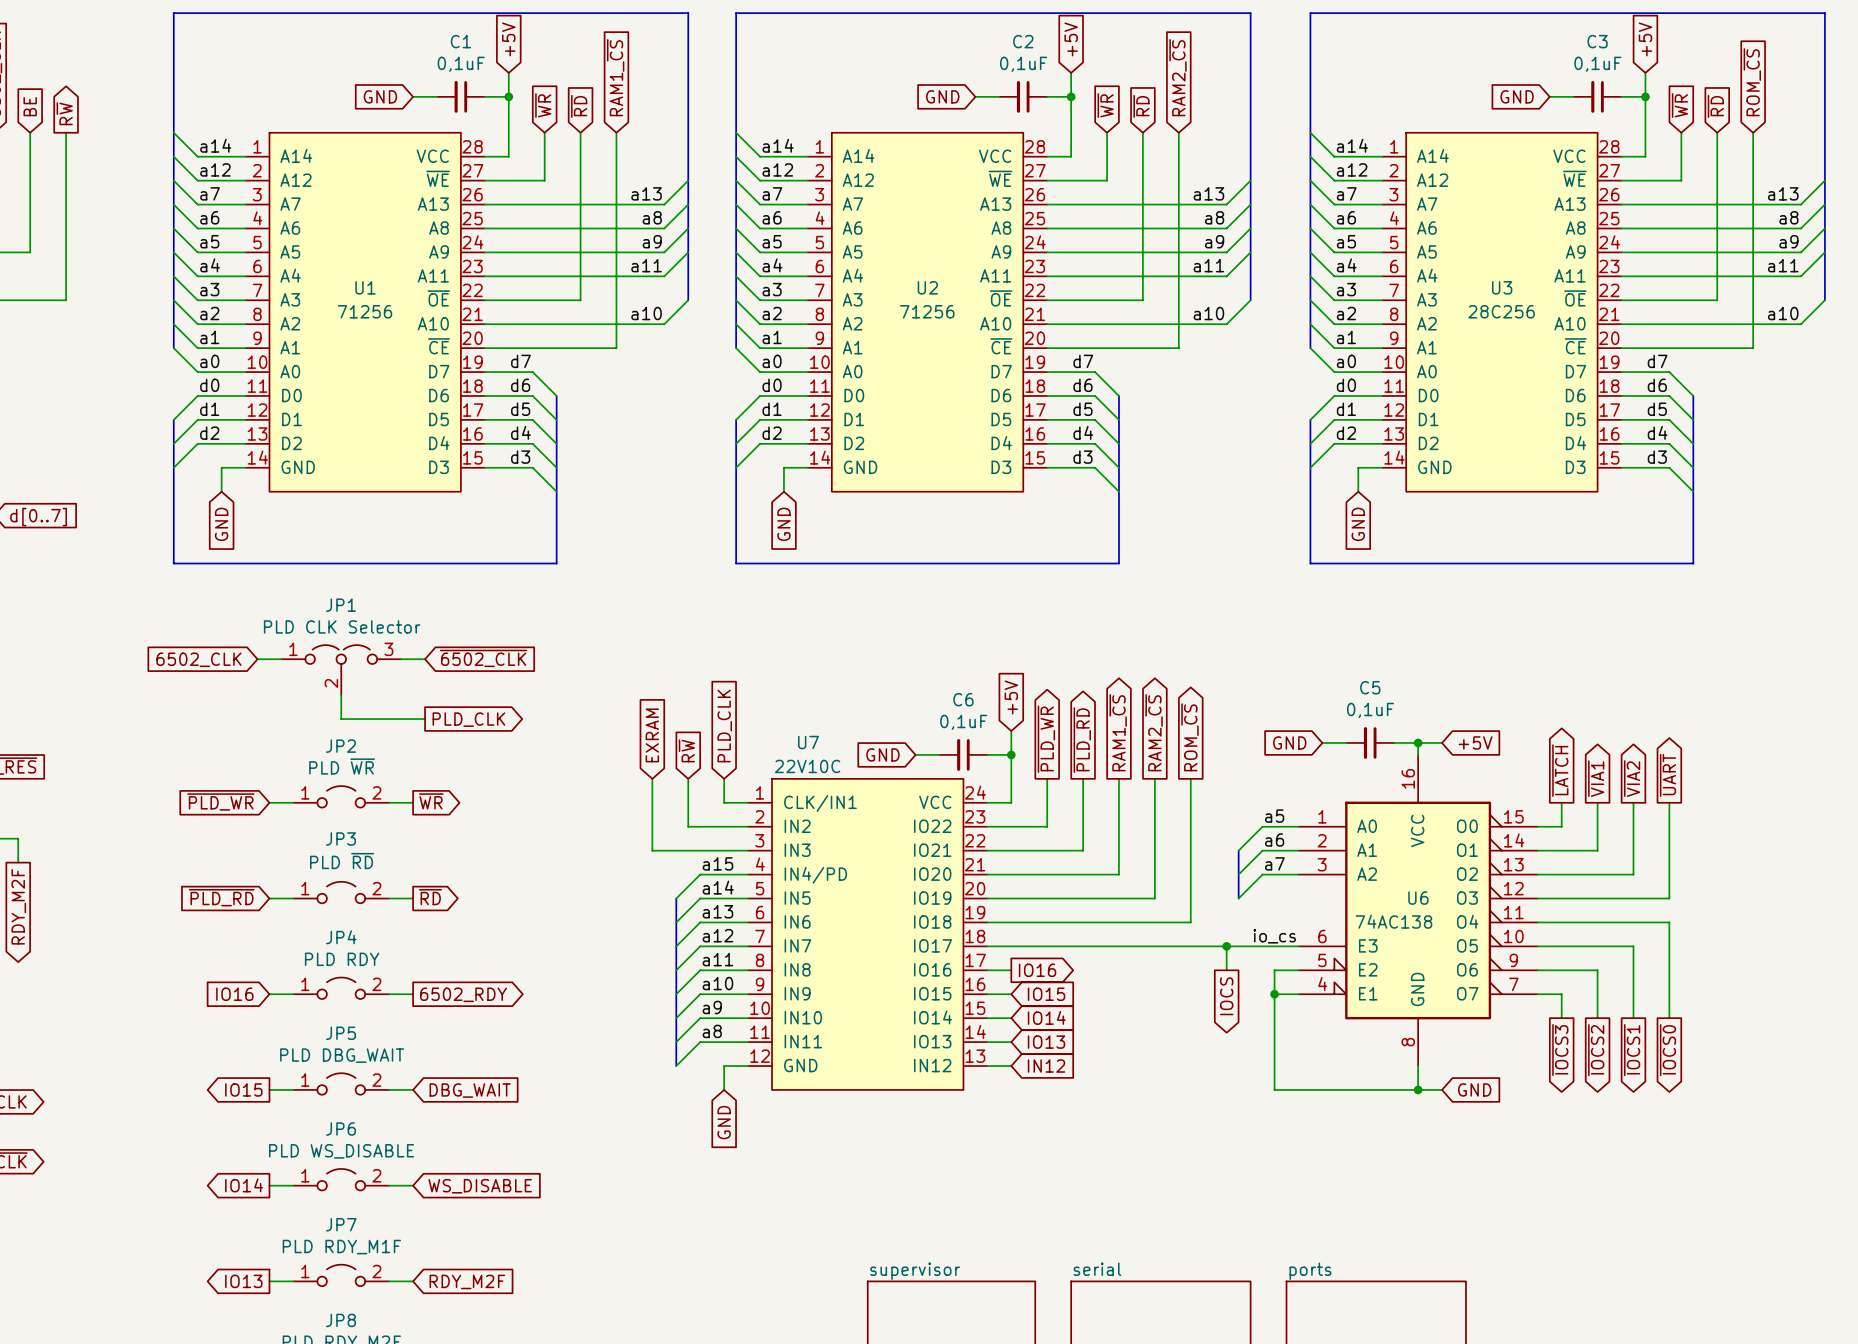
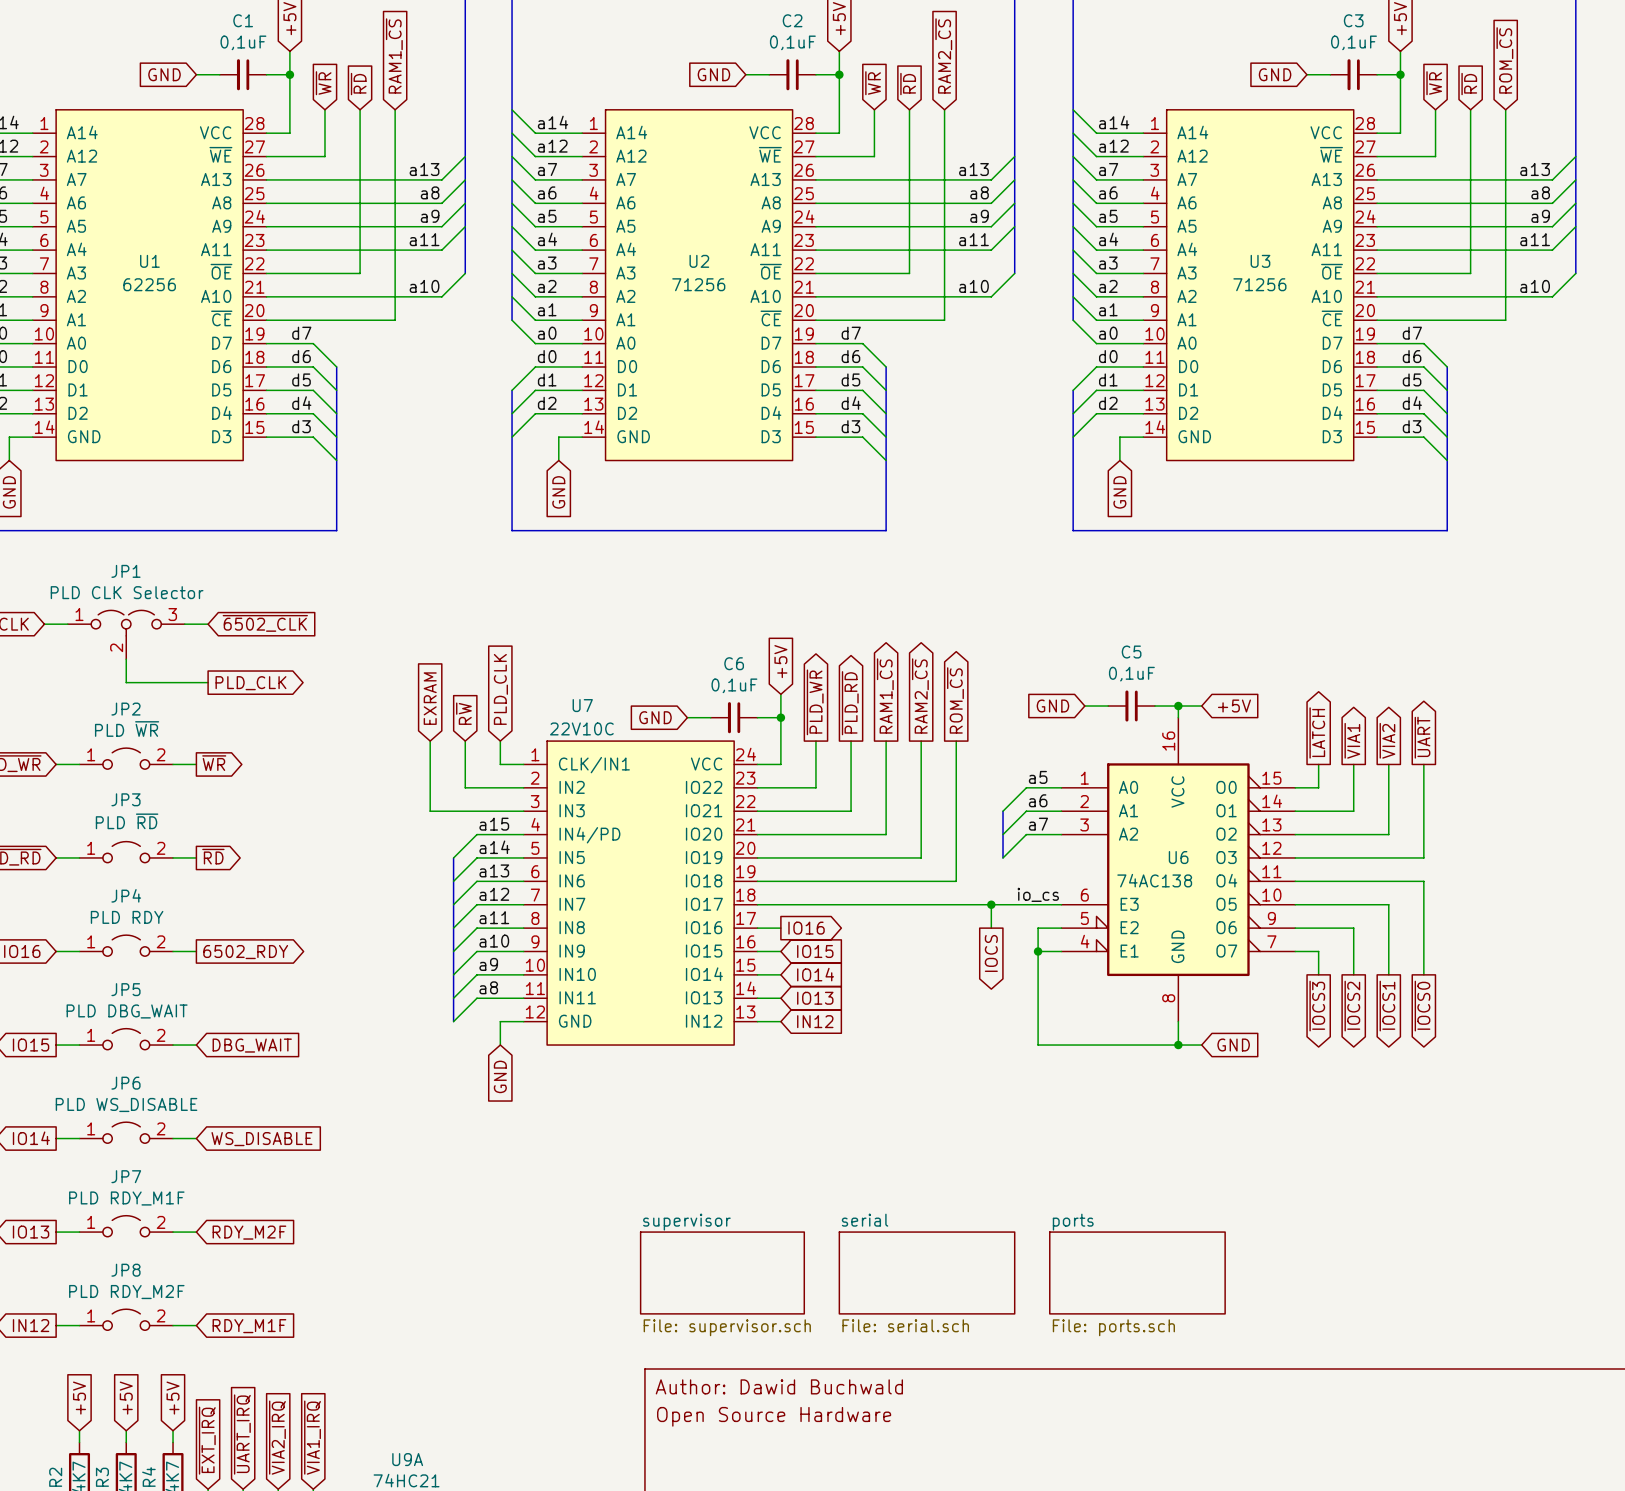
U1 value: 71256 (364, 311) -> 62256 (149, 284)
U3 value: 28C256 (1501, 311) -> 71256 (1259, 284)

